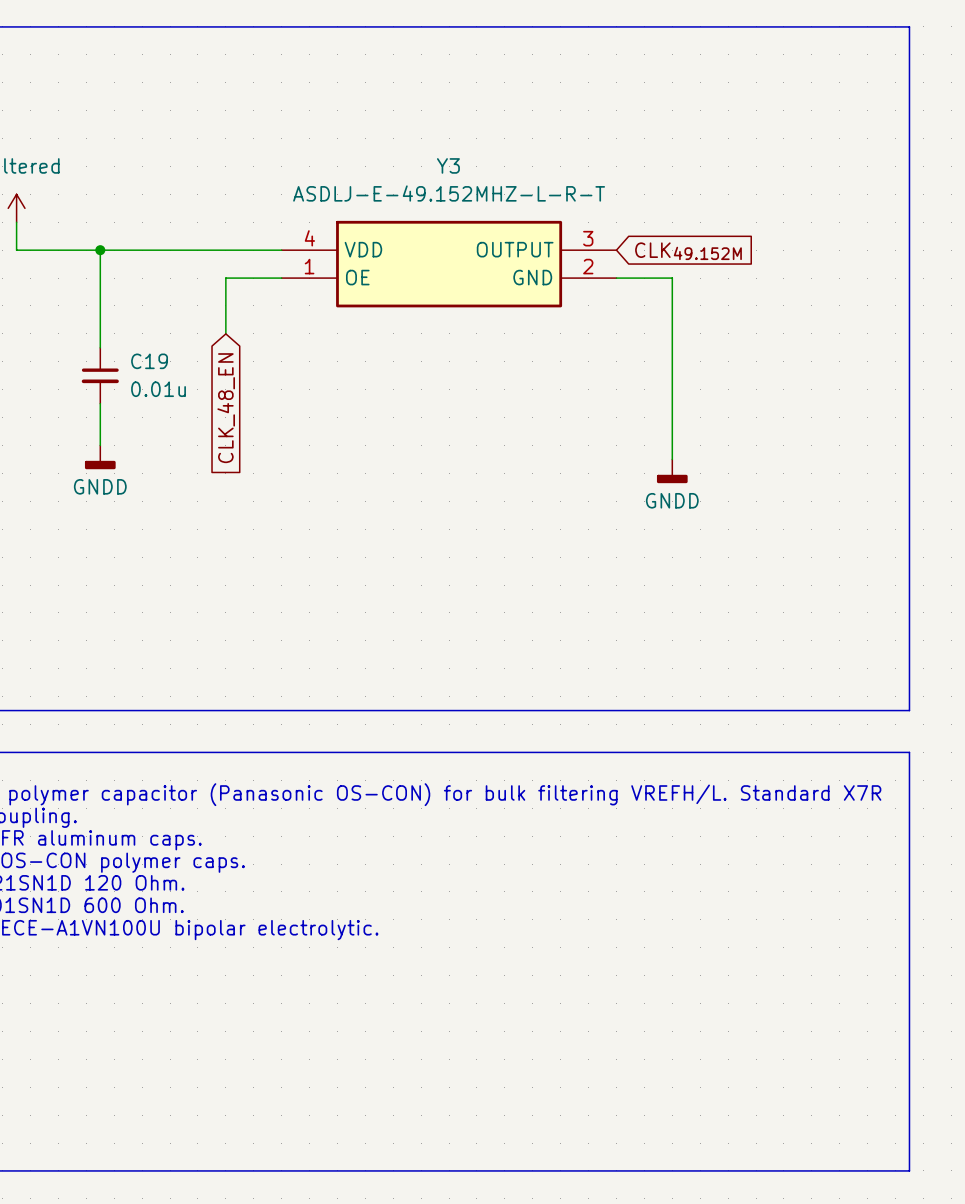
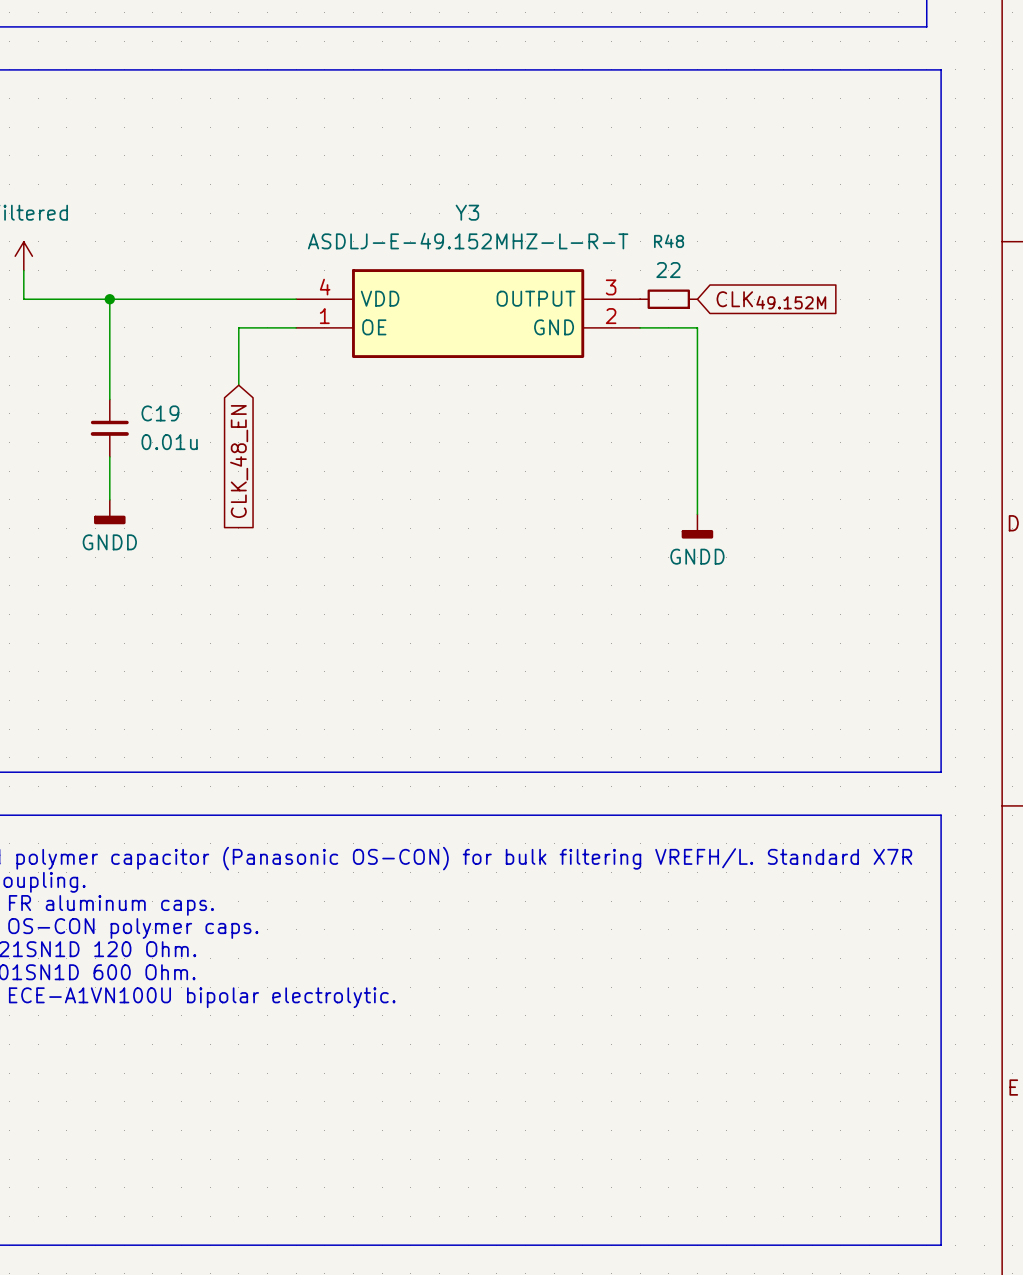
R48: none -> 22 (668, 299)
global label position: CLK49.152M (688, 251) -> CLK49.152M (771, 300)

